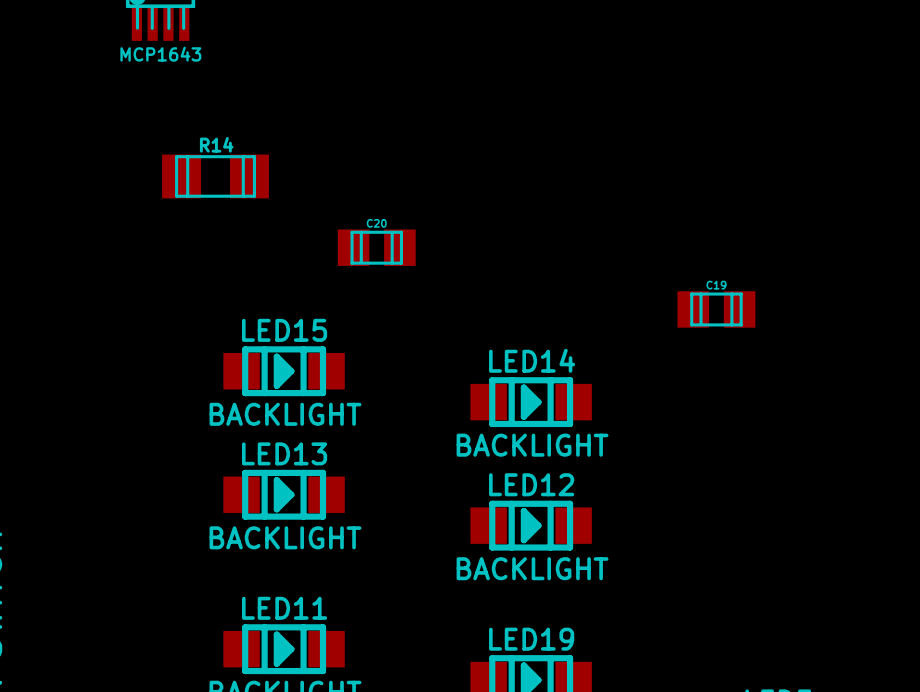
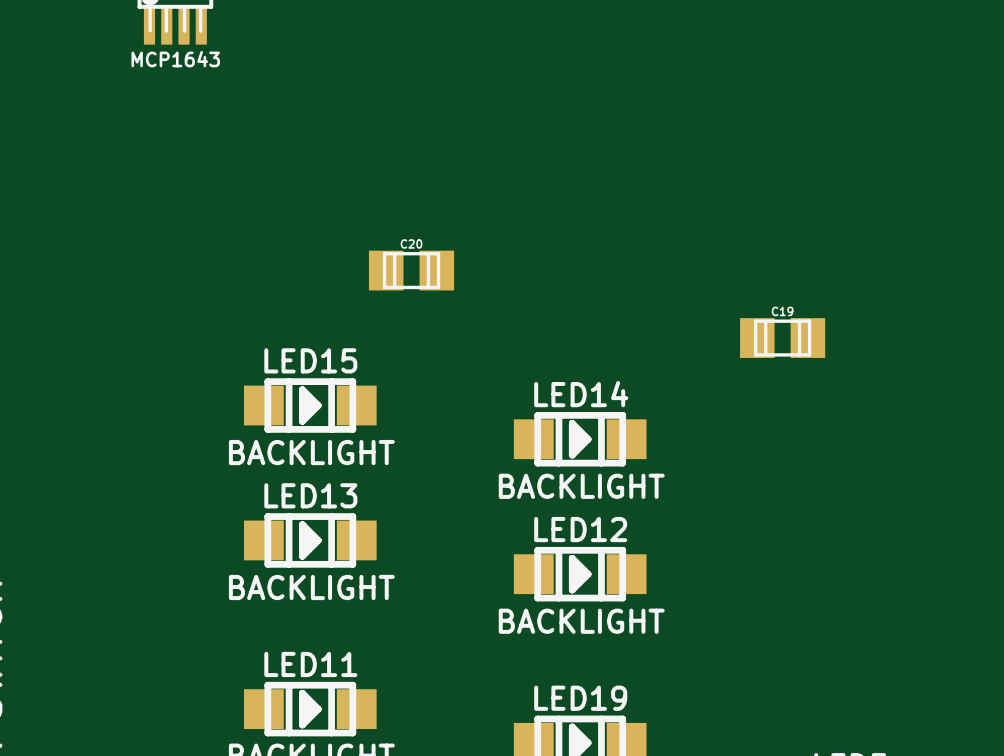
R14: (215, 176) -> none

